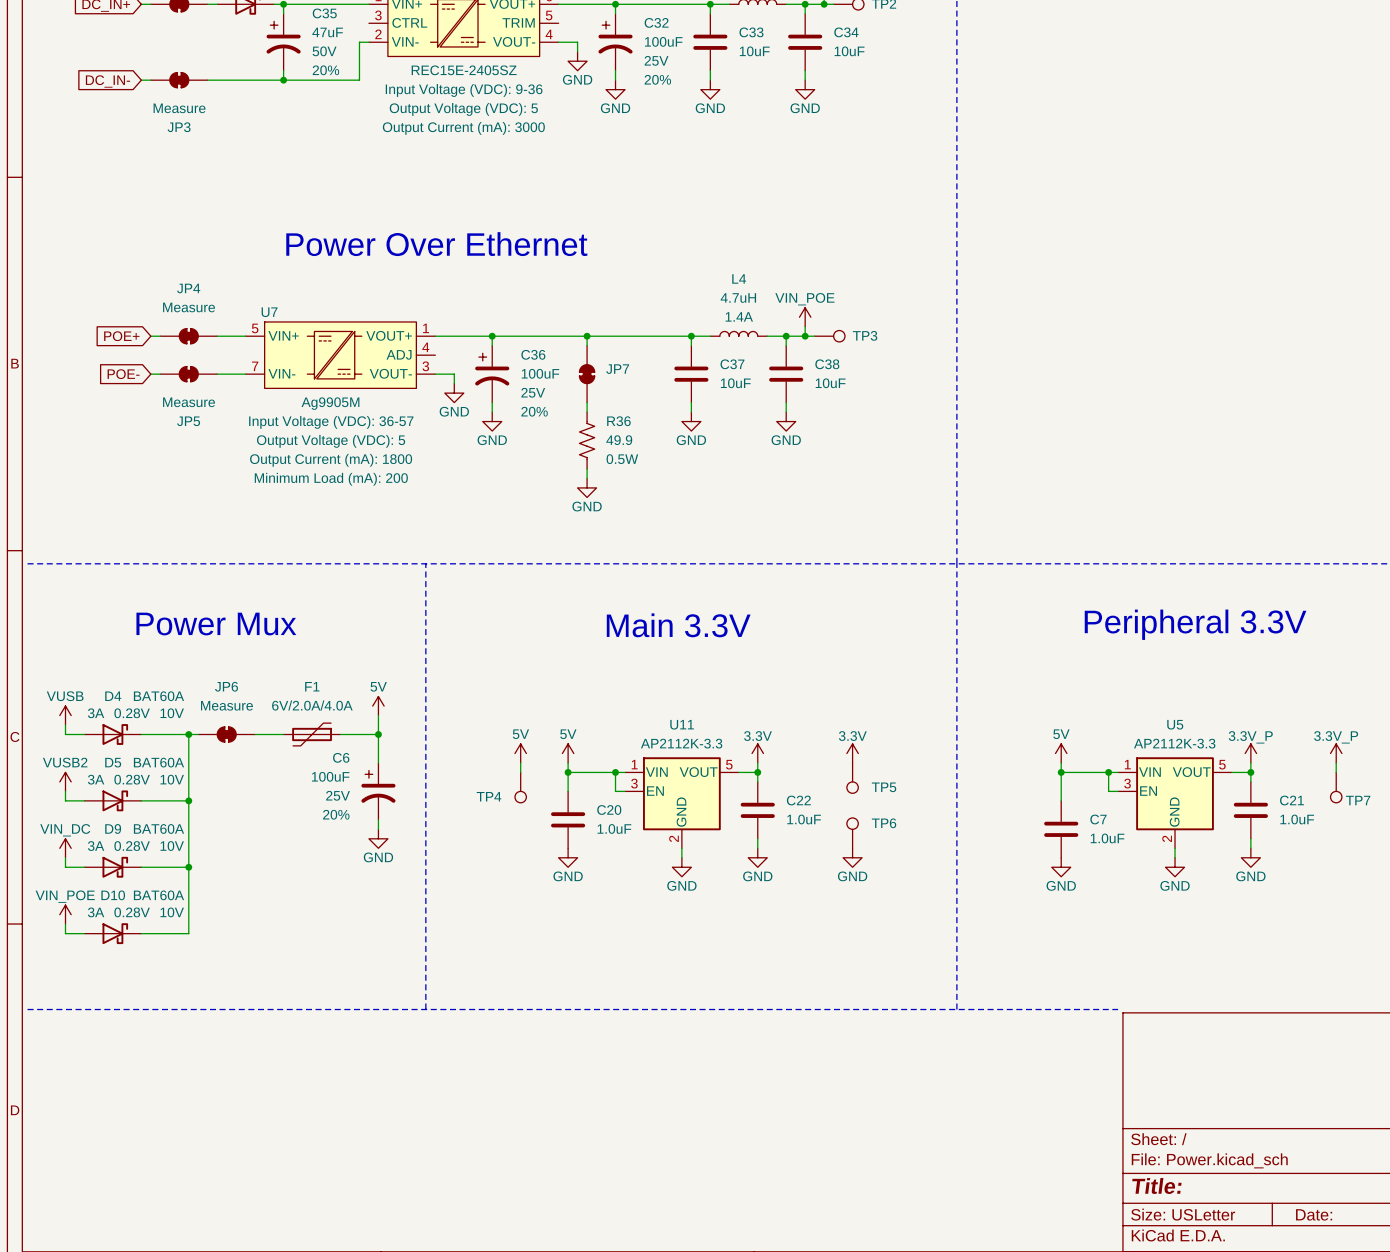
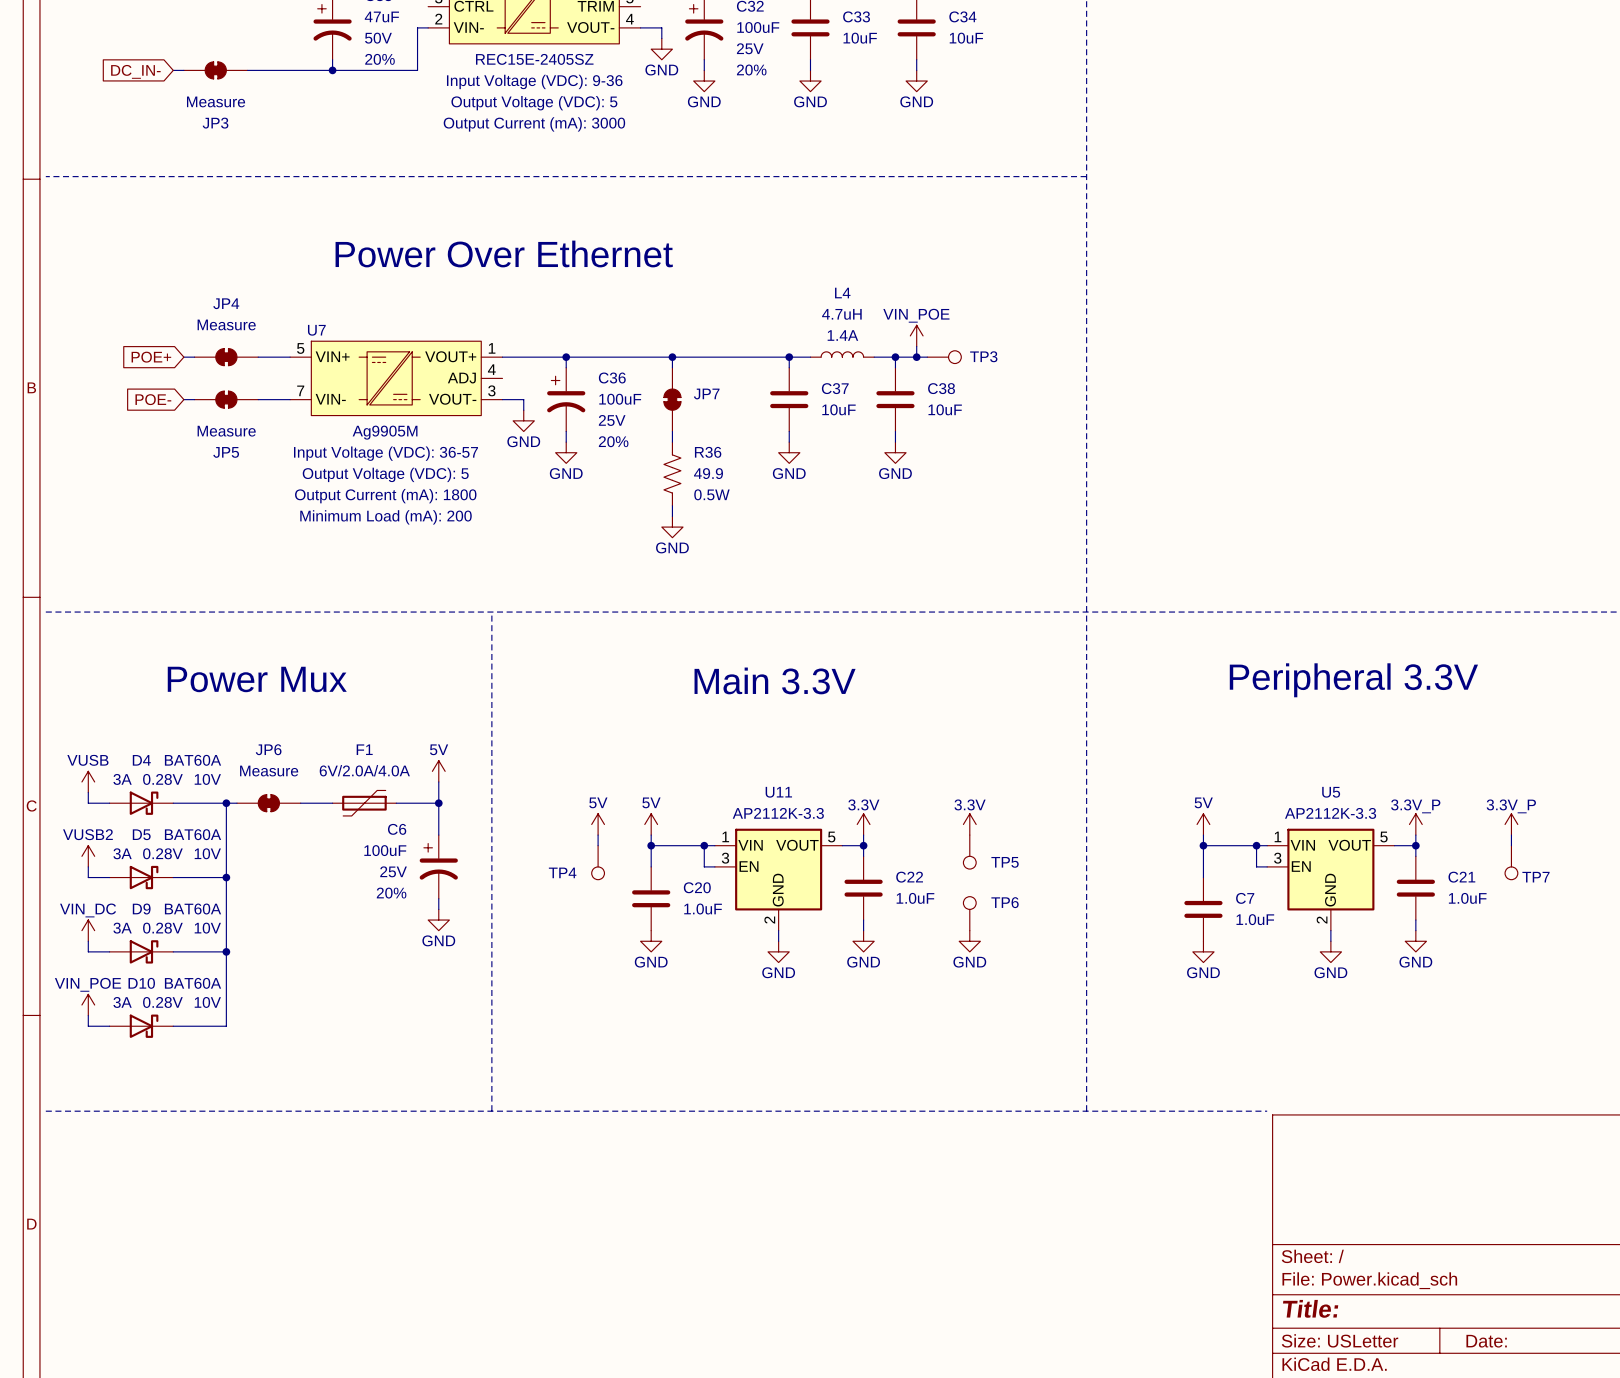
line: none -> (45, 176) (1086, 176)

